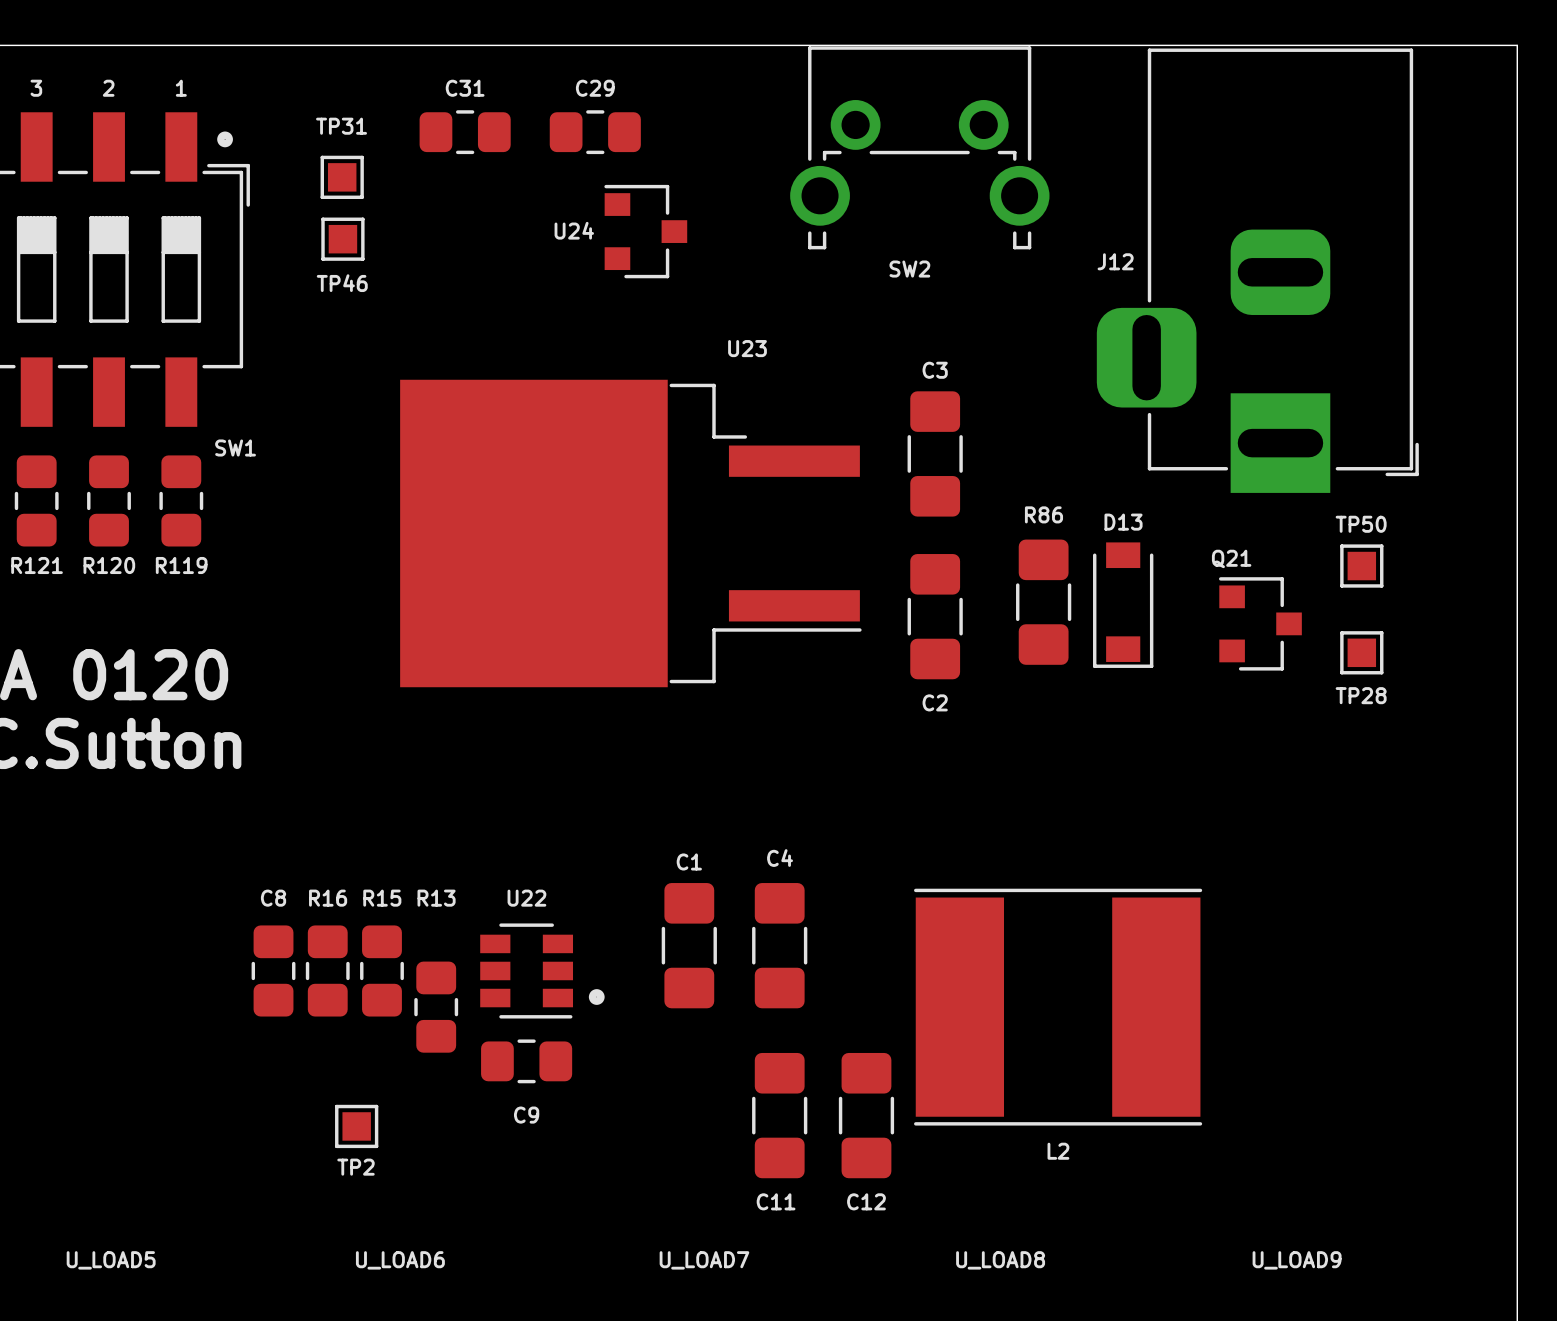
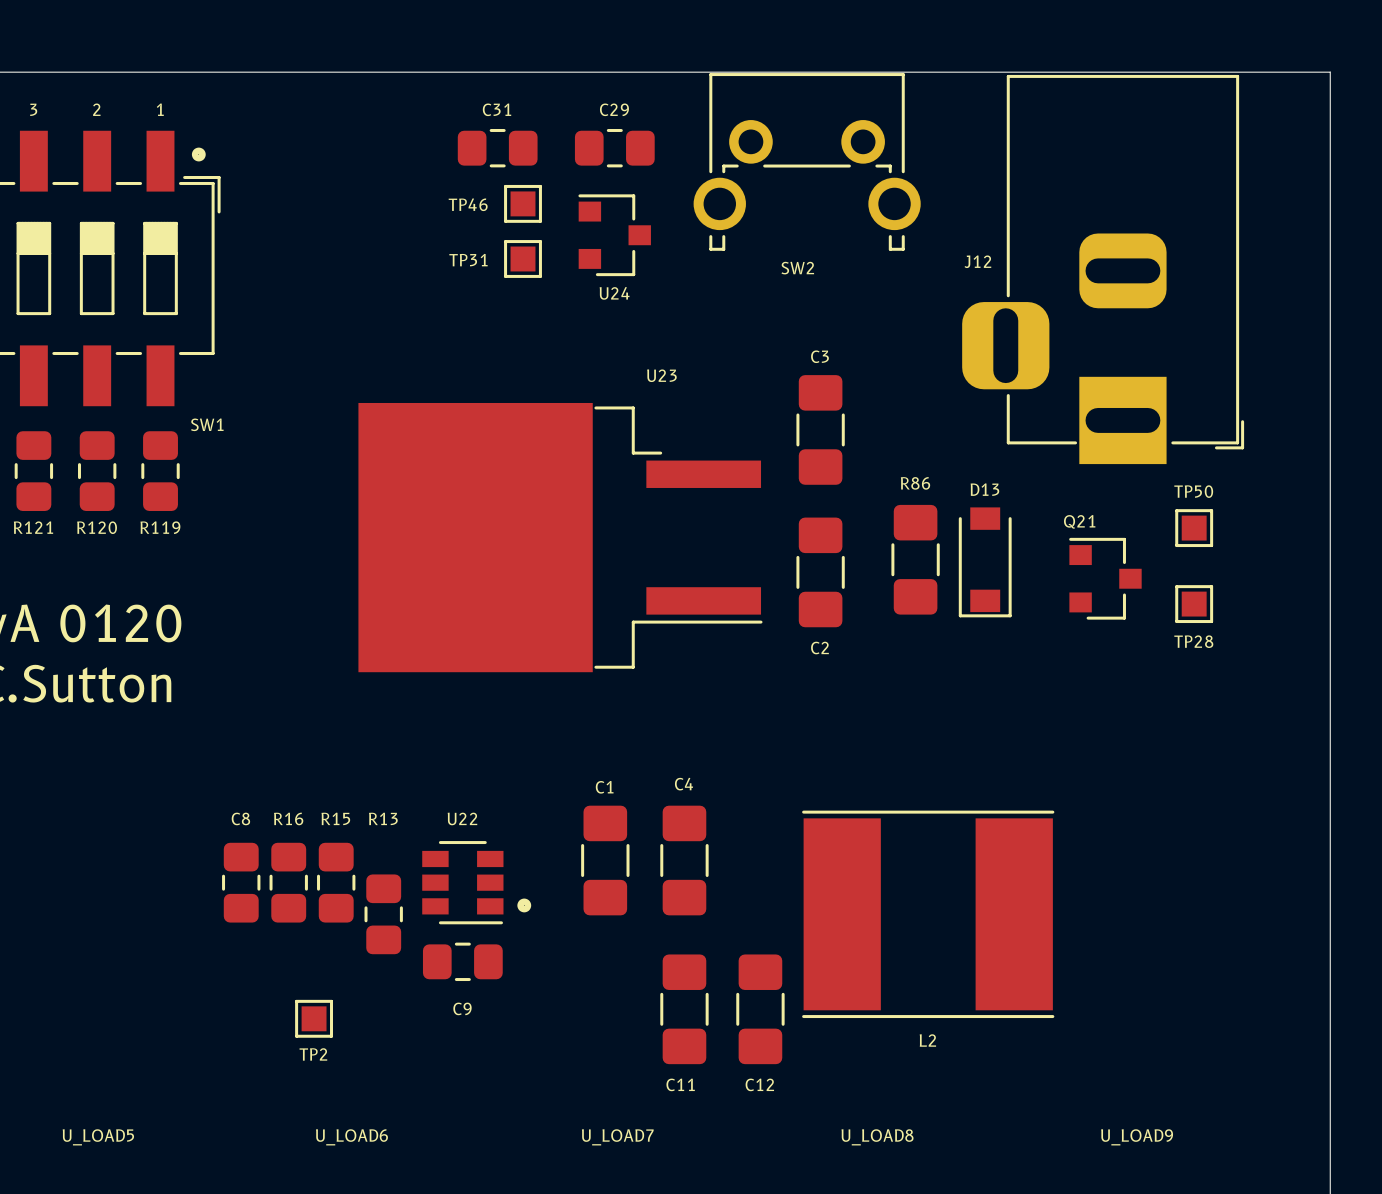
TP31 name position: TP31 (341, 126) -> TP31 (468, 260)
C31 position: (465, 132) -> (497, 148)
C29 position: (595, 132) -> (614, 148)
TP31 position: (342, 177) -> (523, 258)
U24 name position: U24 (574, 230) -> U24 (614, 293)
U24 position: (645, 231) -> (614, 235)
TP46 position: (342, 239) -> (523, 203)
TP46 name position: TP46 (342, 283) -> TP46 (468, 204)
U23 position: (630, 533) -> (560, 537)

